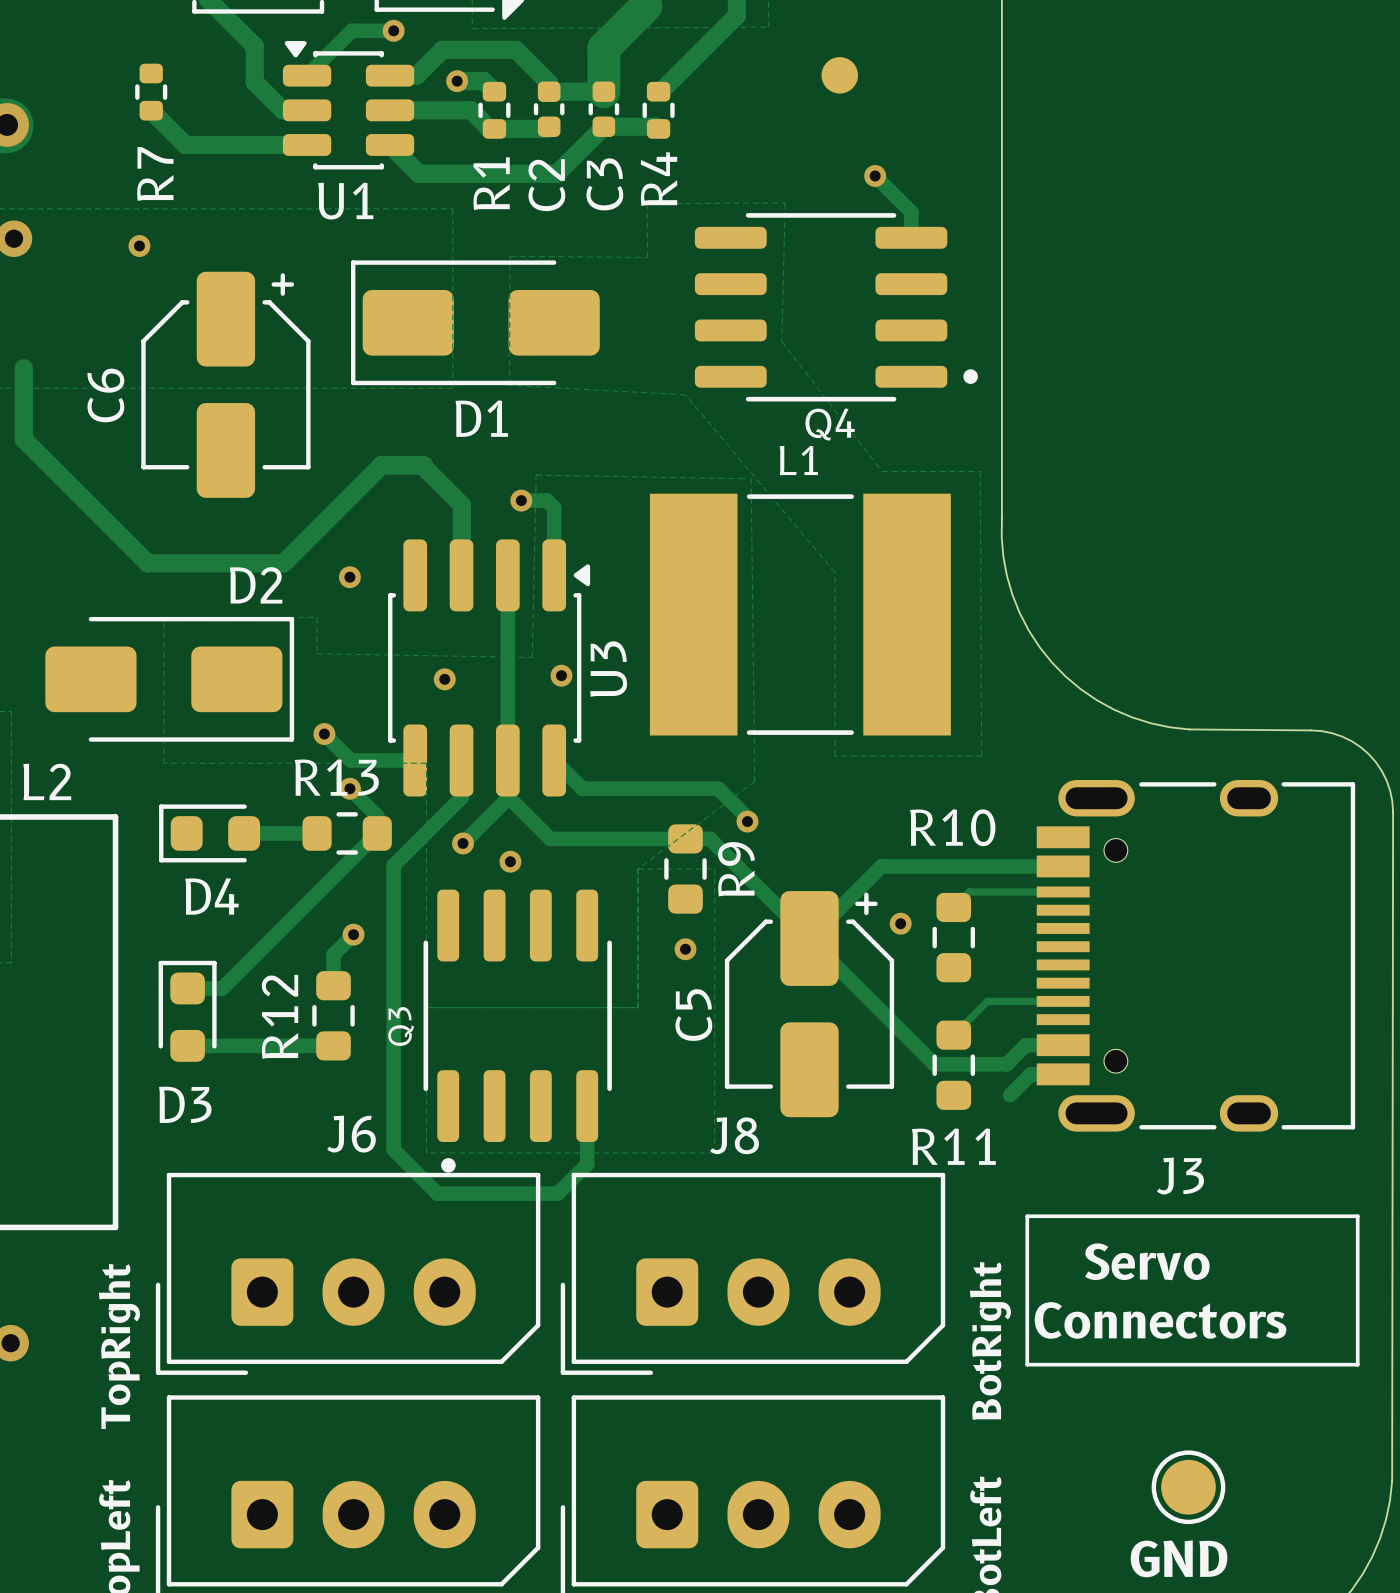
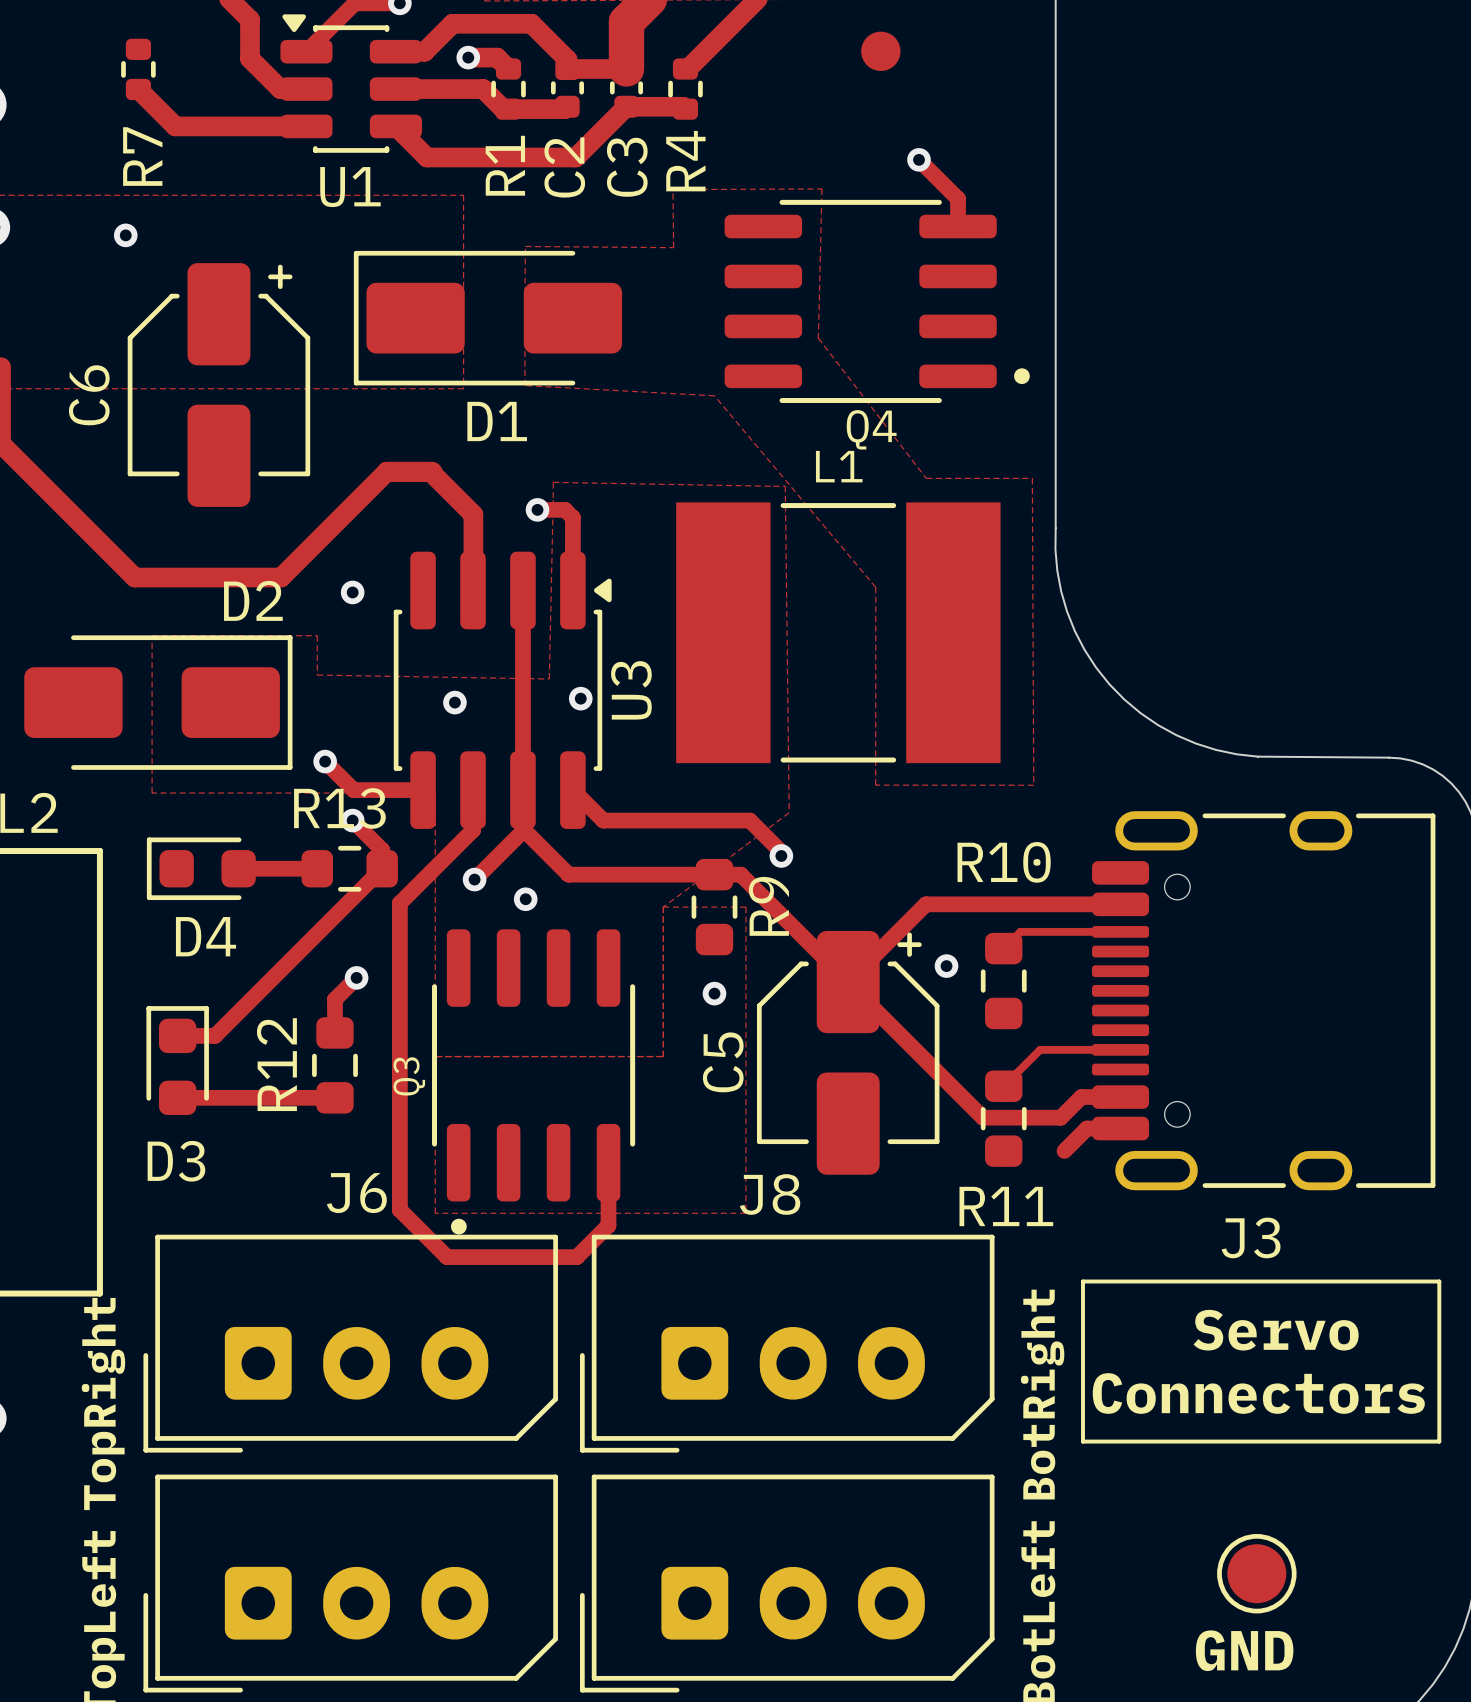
J3 footprint: [1036, 780, 1356, 1132] -> [1092, 811, 1436, 1191]

